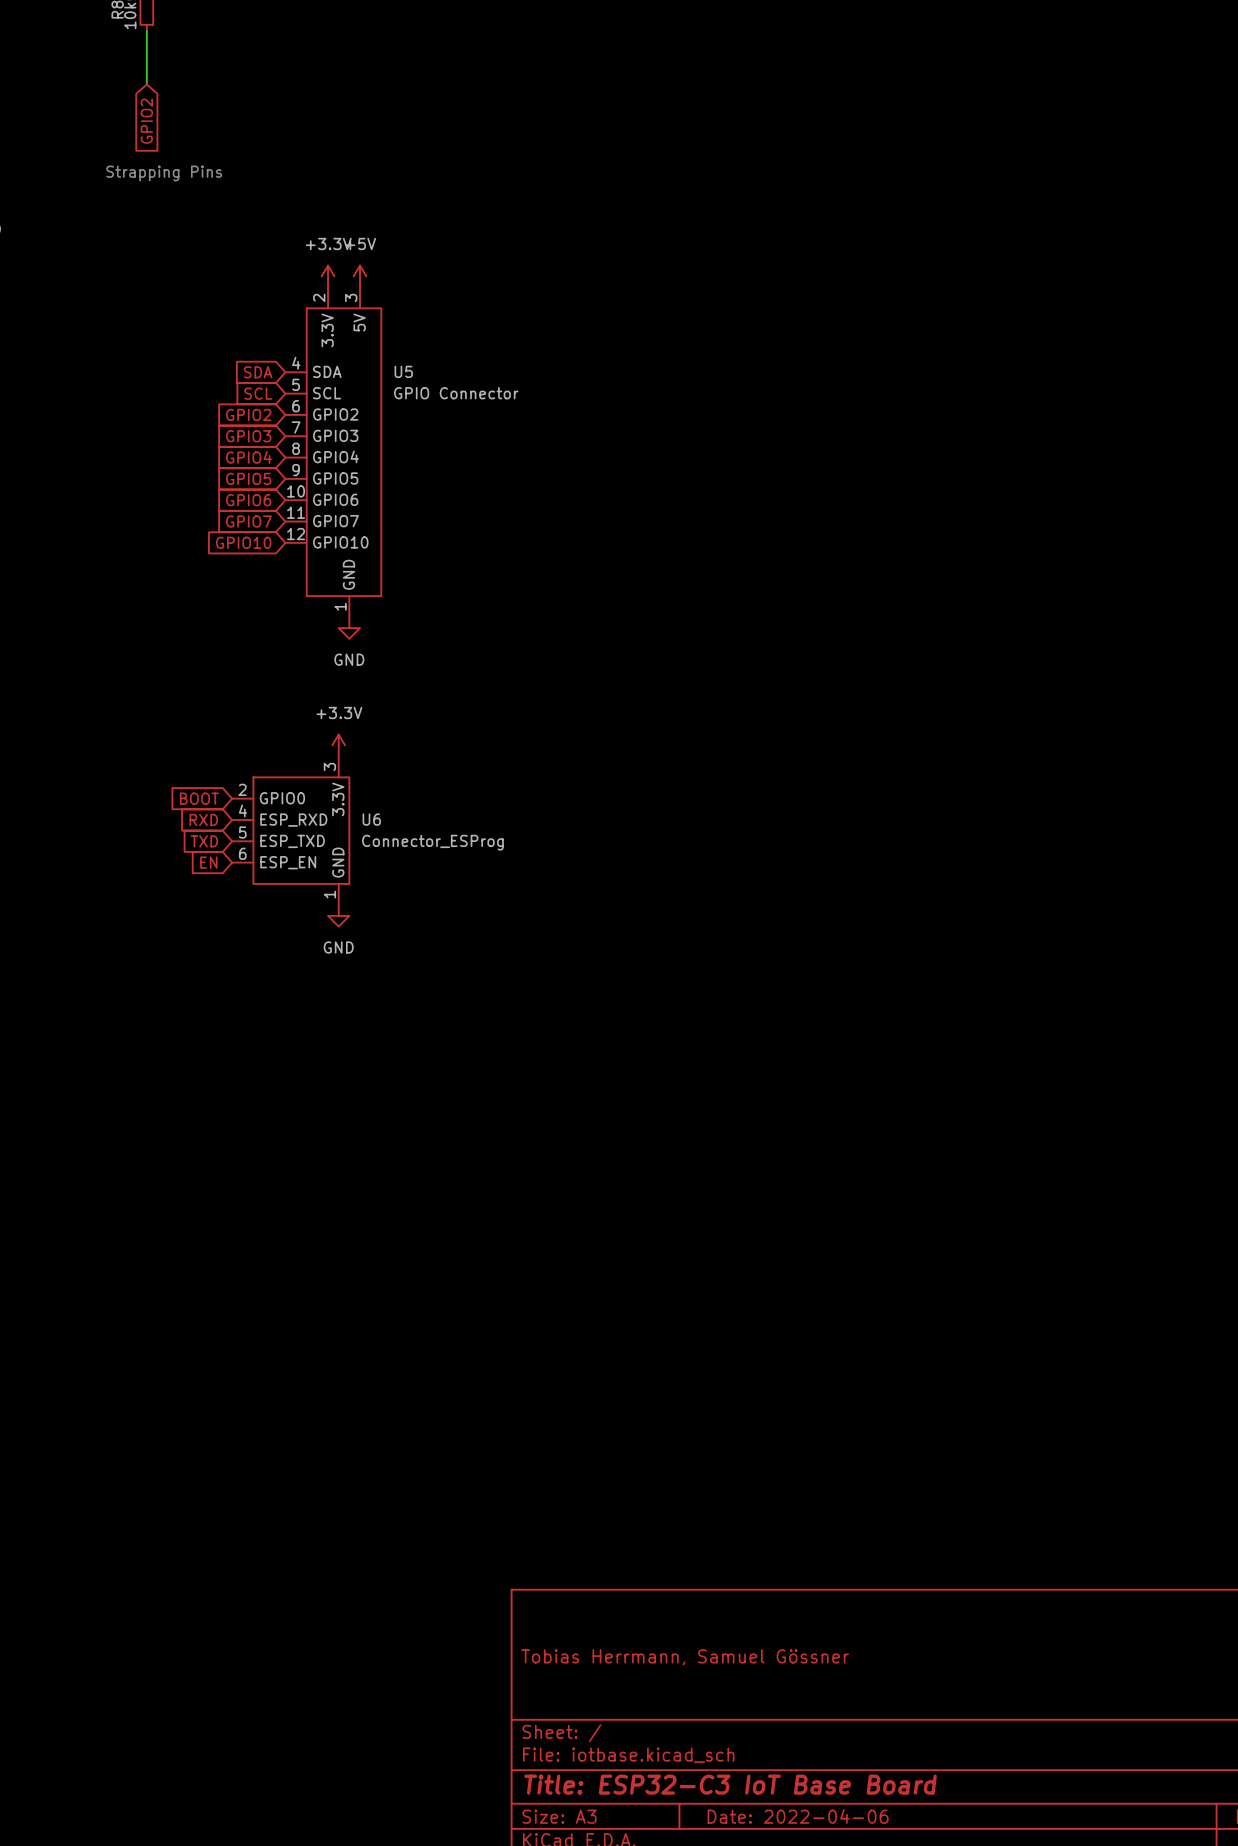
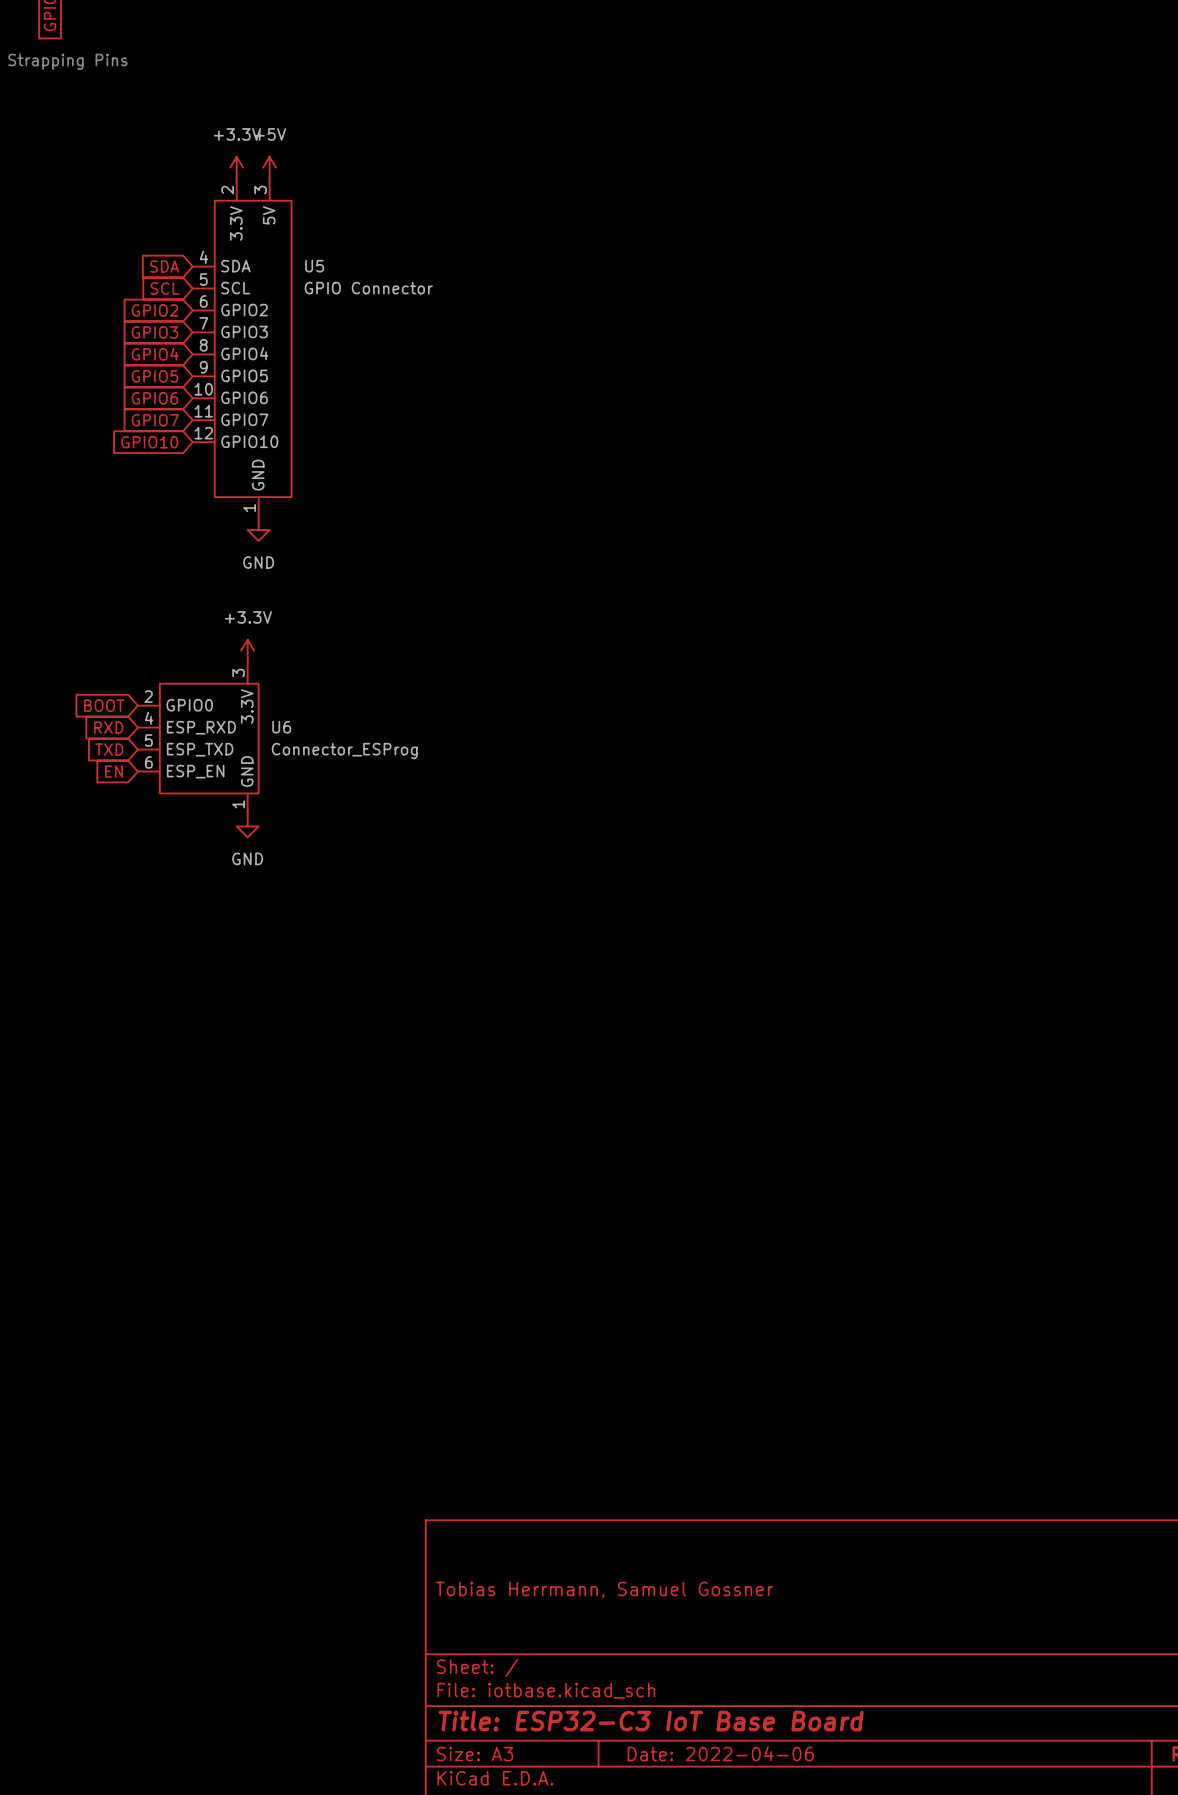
title block: Tobias Herrmann, Samuel Gössner (685, 1657) -> Tobias Herrmann, Samuel Gossner (604, 1589)

